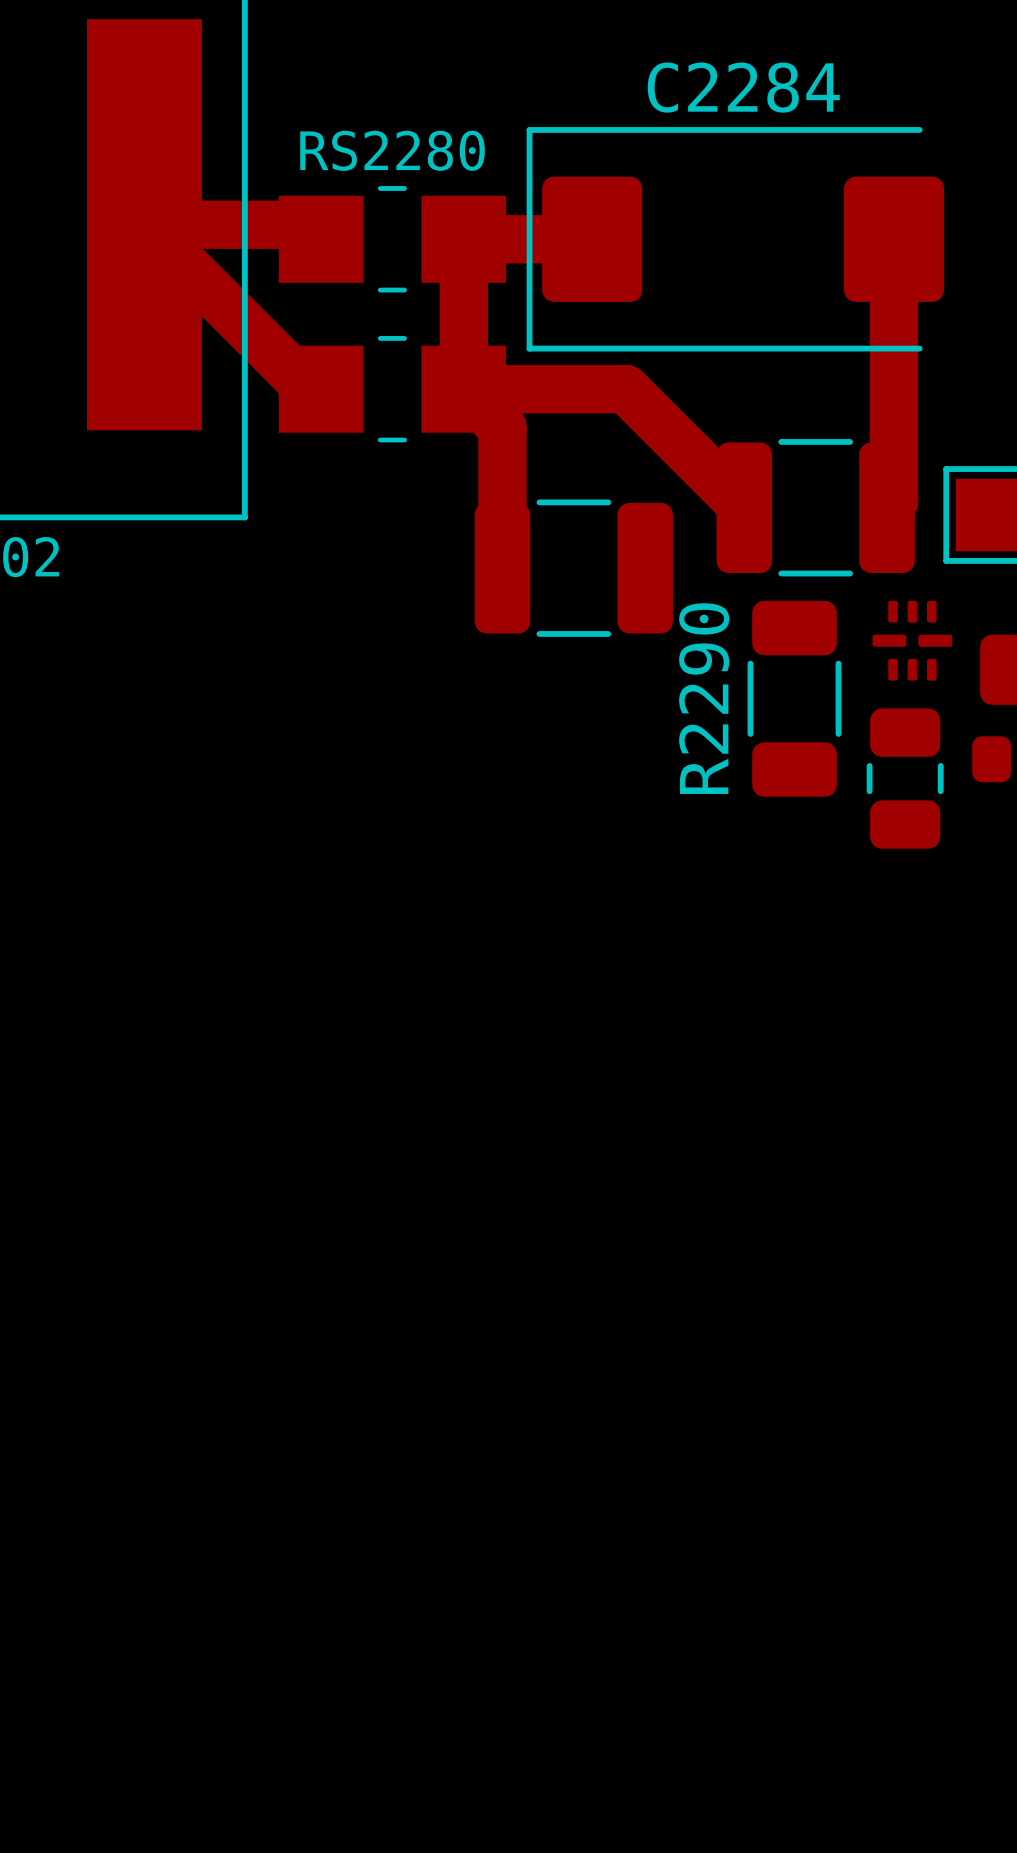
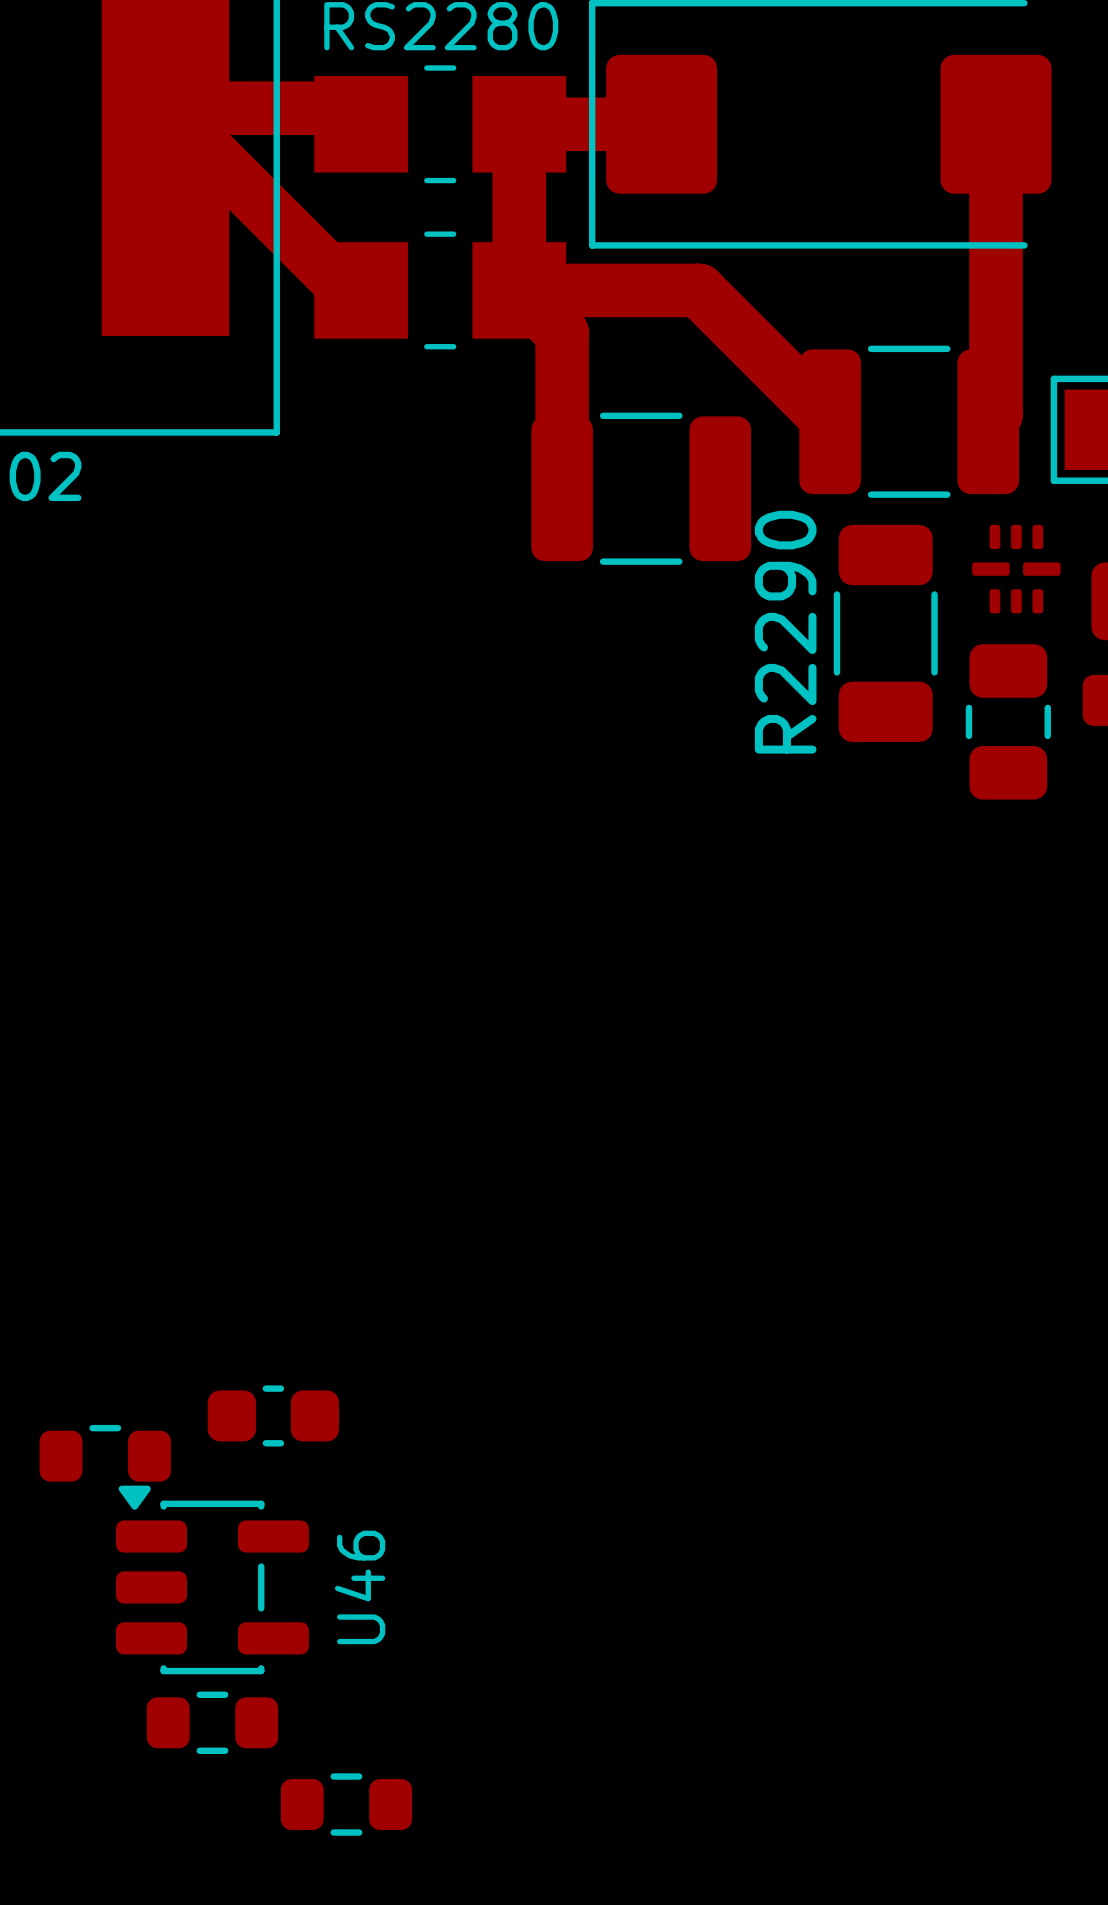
part: none -> (273, 1415)
part: none -> (105, 1453)
U46: none -> (212, 1579)
part: none -> (212, 1722)
part: none -> (346, 1804)

